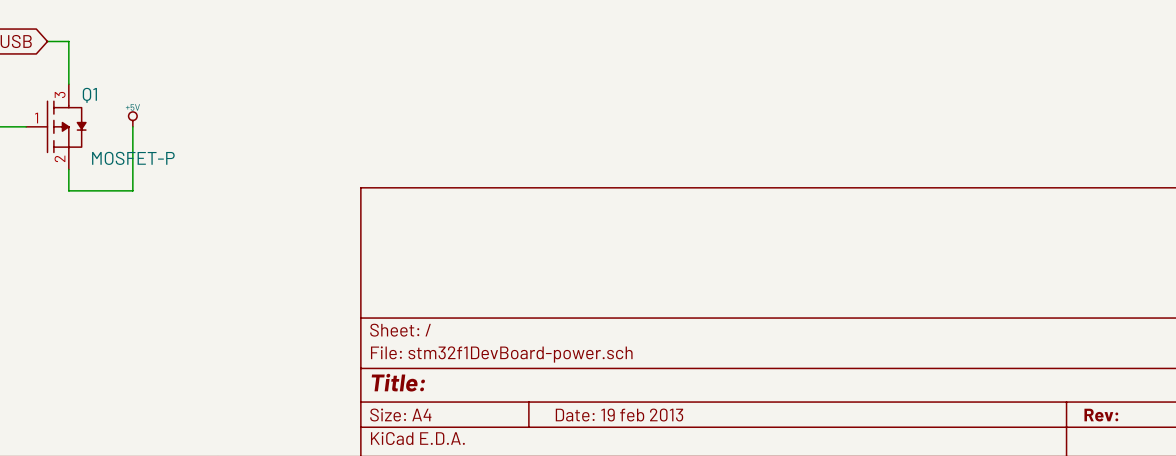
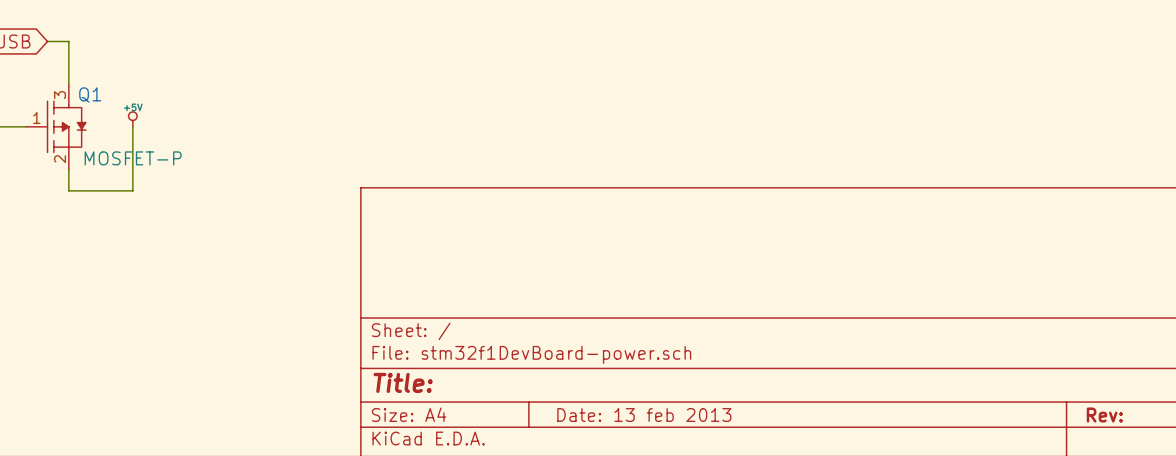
title block: Date: 19 feb 2013 (619, 415) -> Date: 13 feb 2013 (644, 415)

